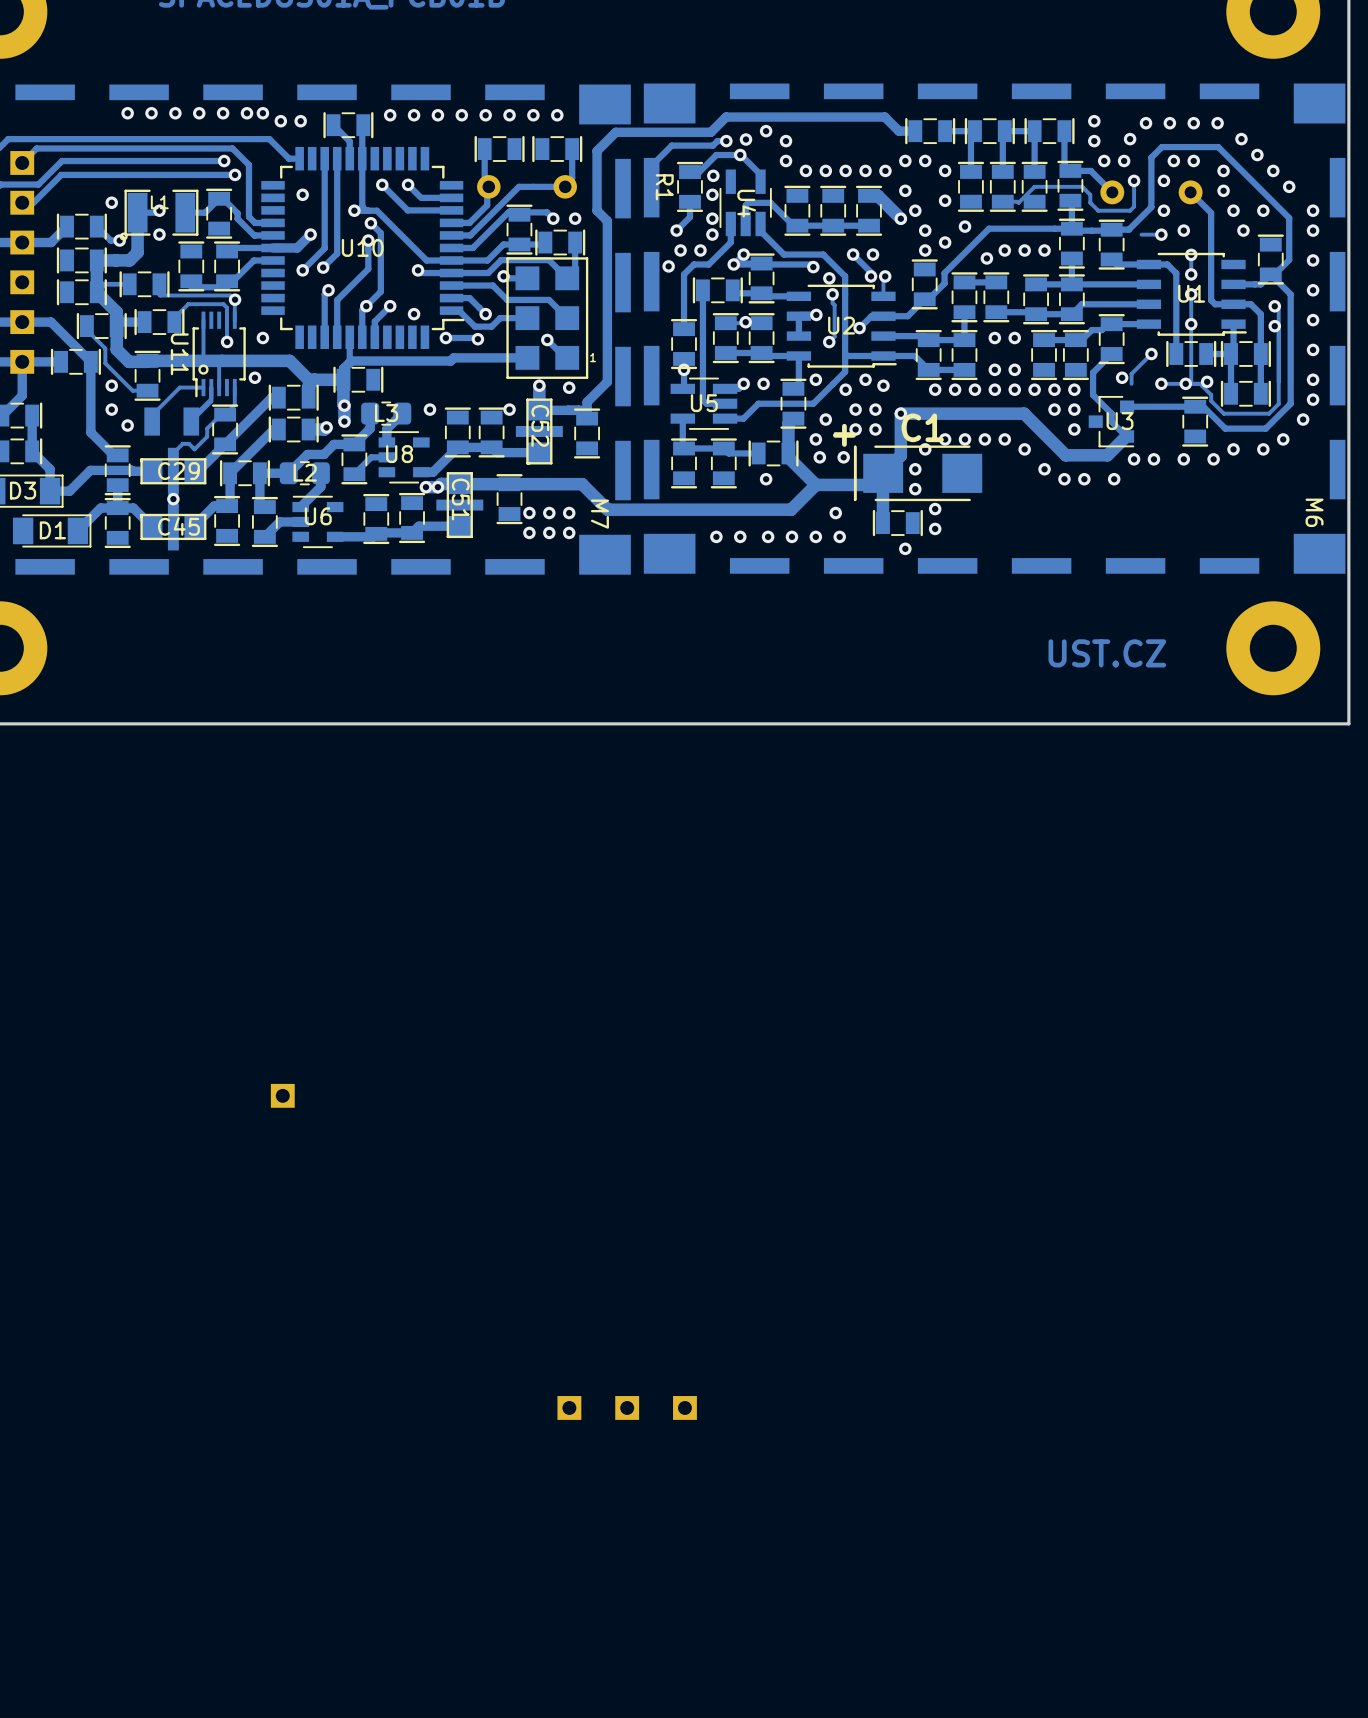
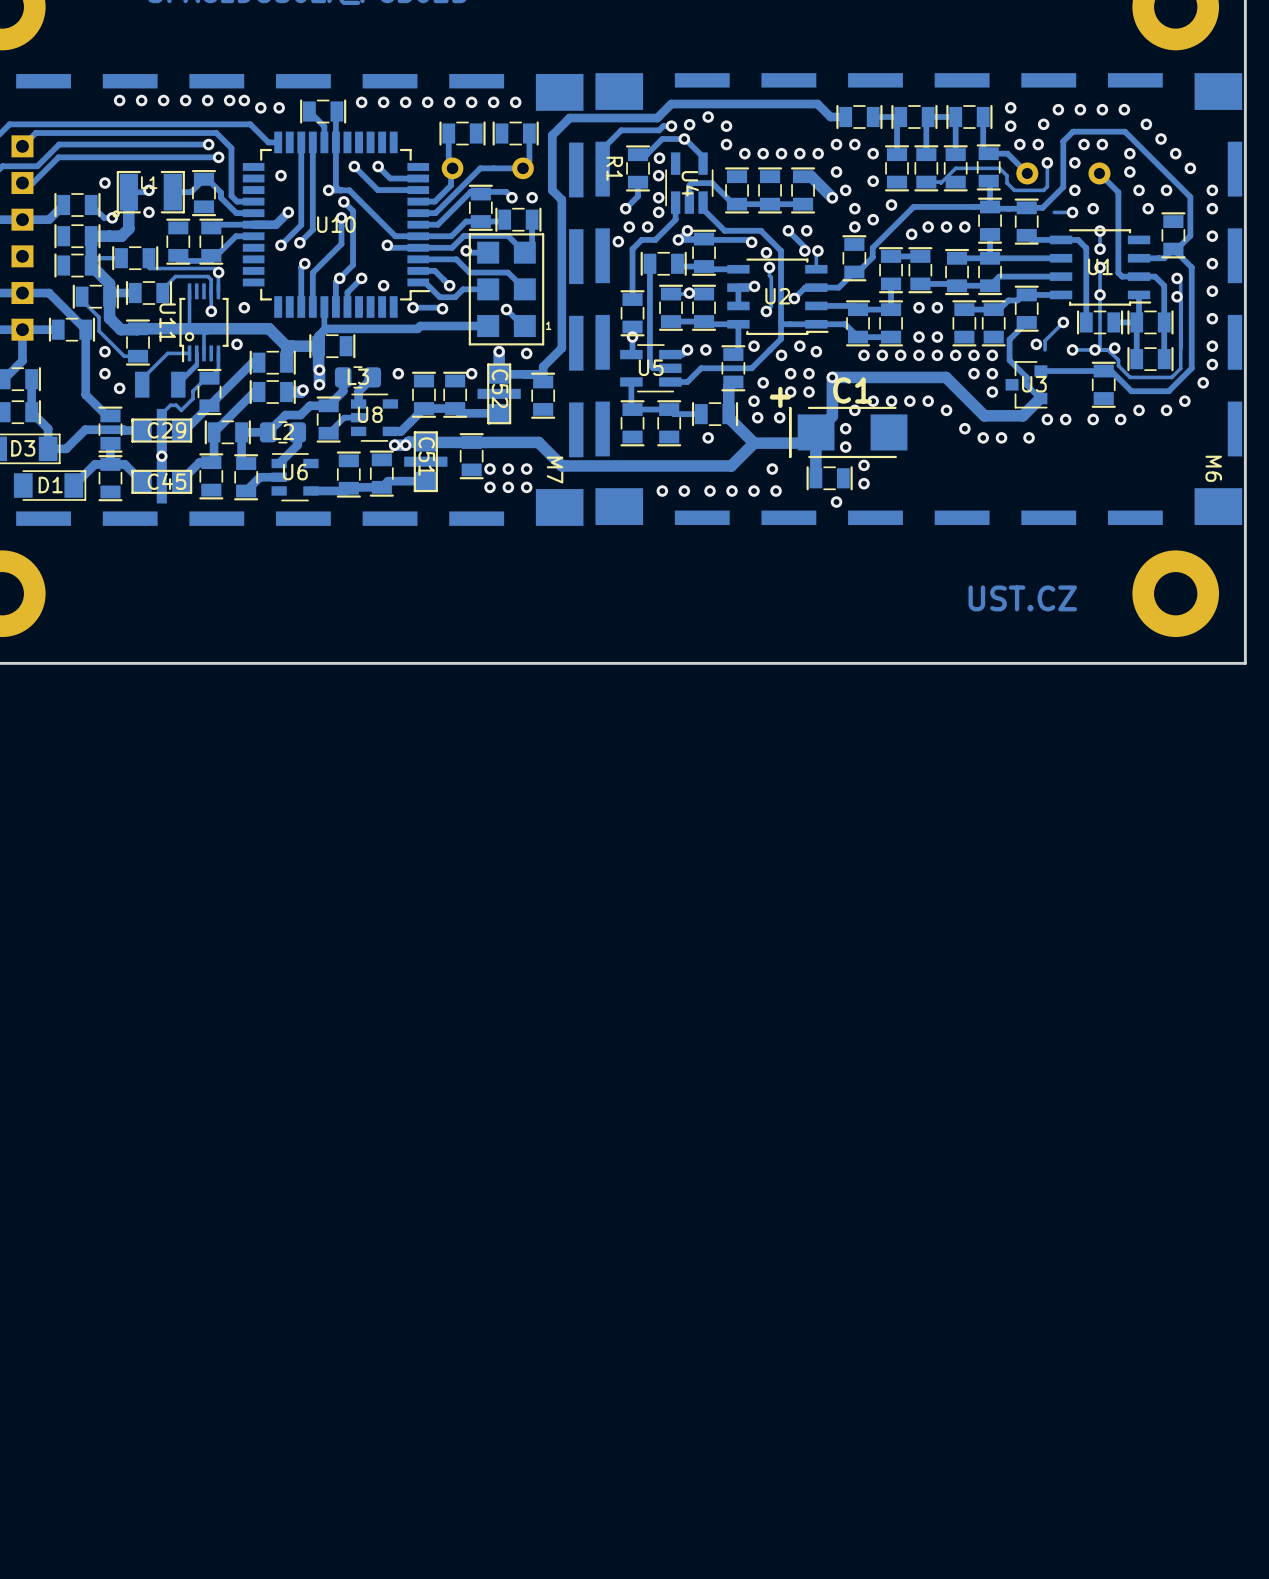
part: (282, 1095) -> none
part: (569, 1407) -> none
part: (627, 1407) -> none
part: (684, 1407) -> none

